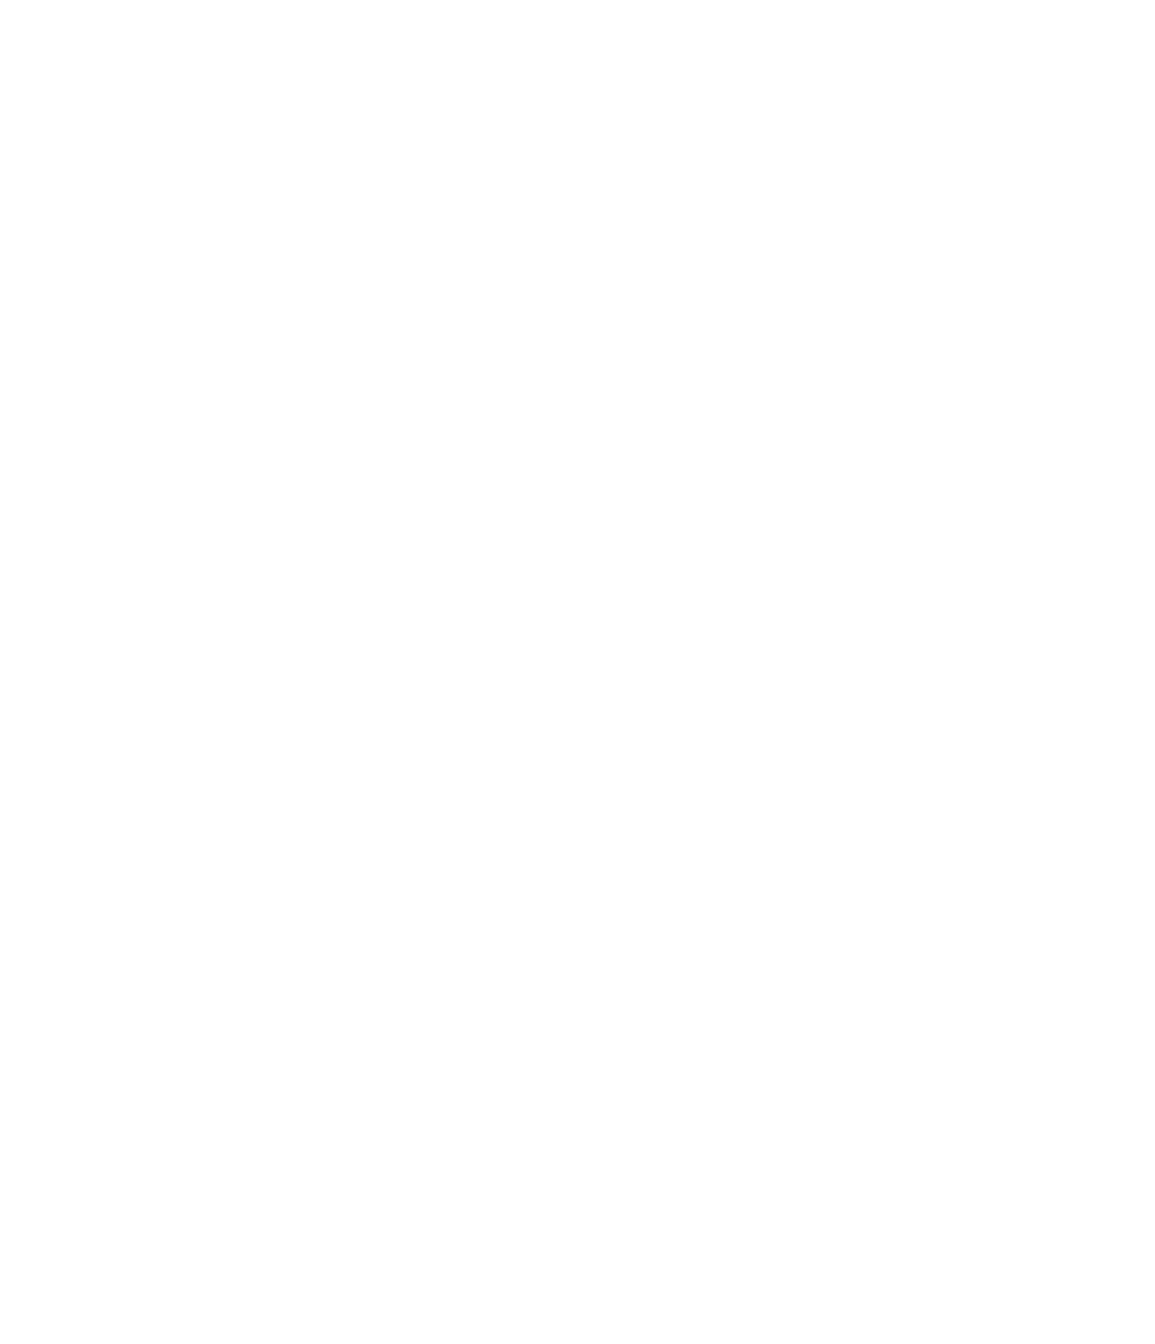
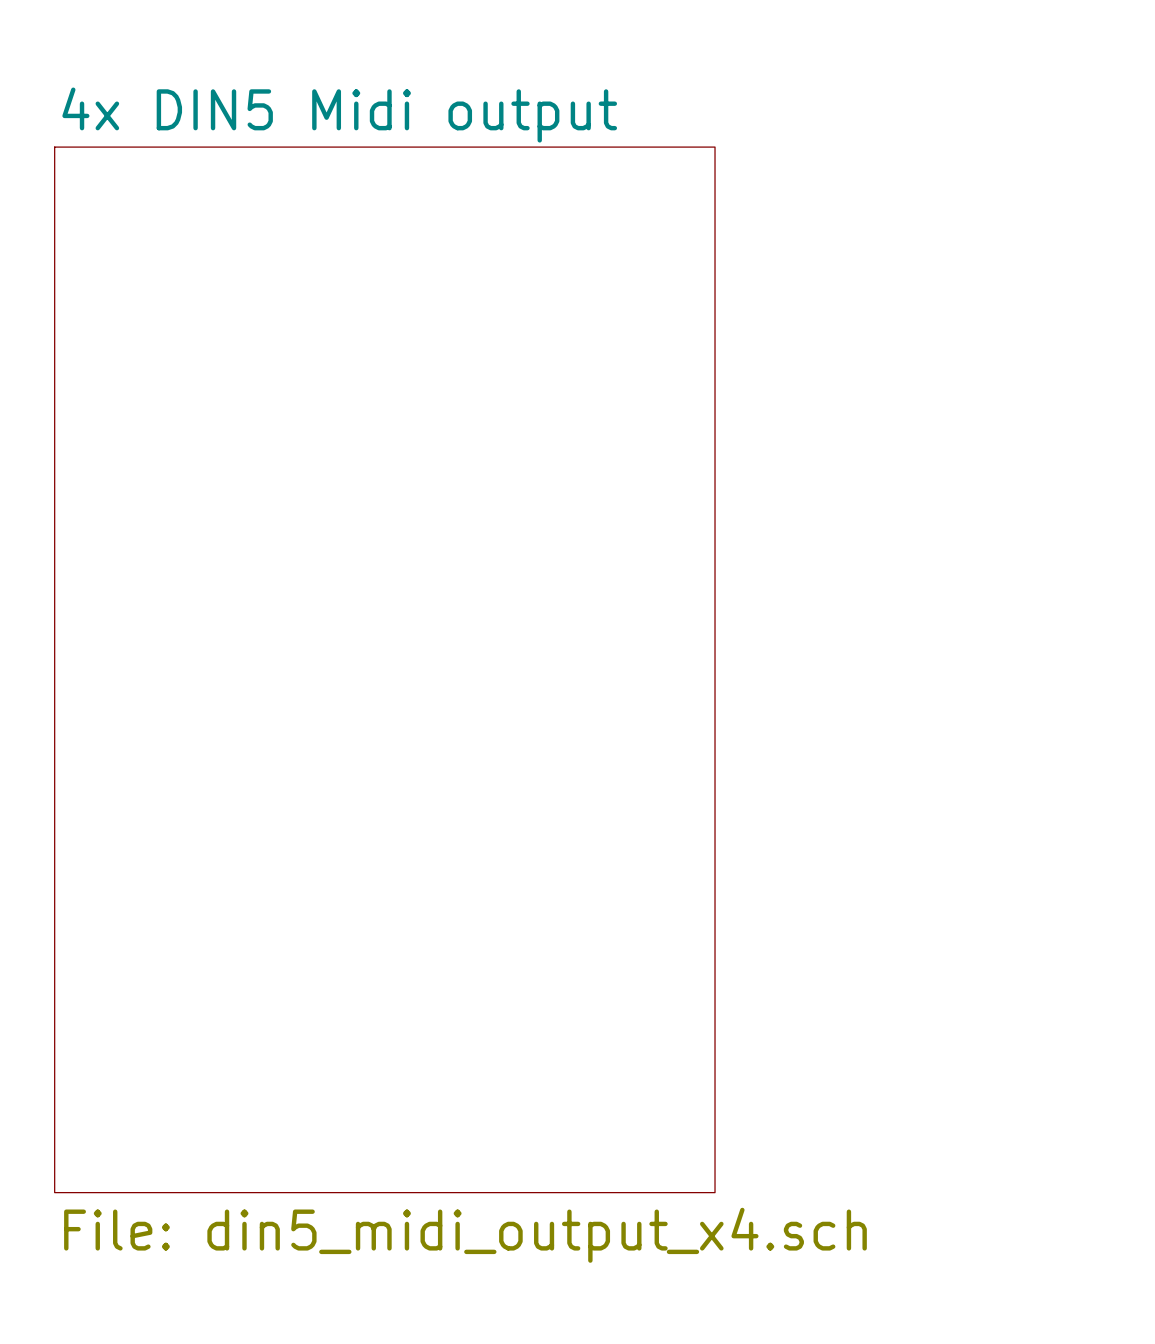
sheet 4x DIN5 Midi output: none -> File: din5_midi_output_x4.sch (384, 669)

